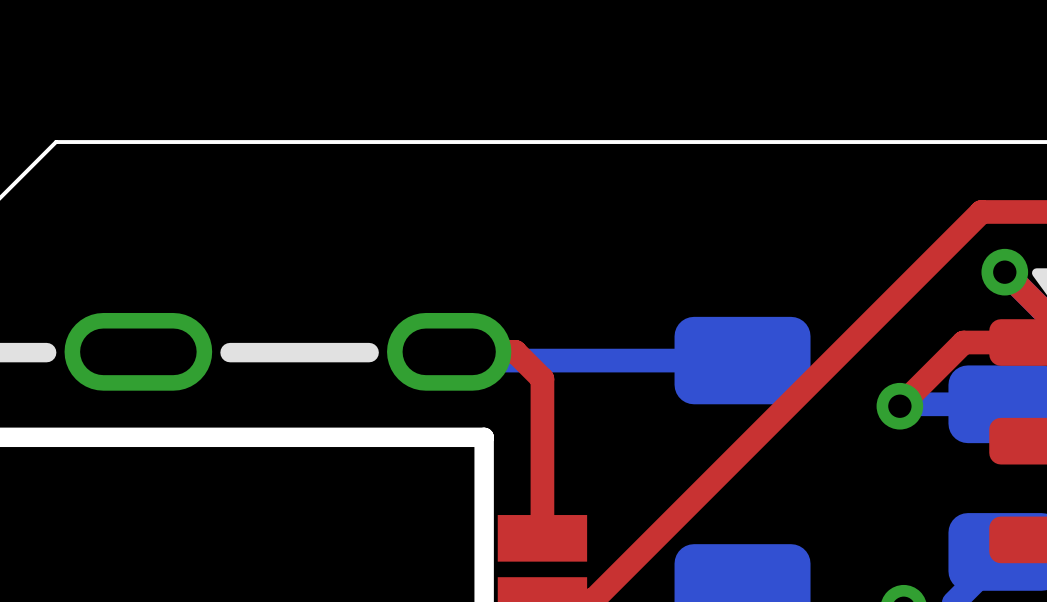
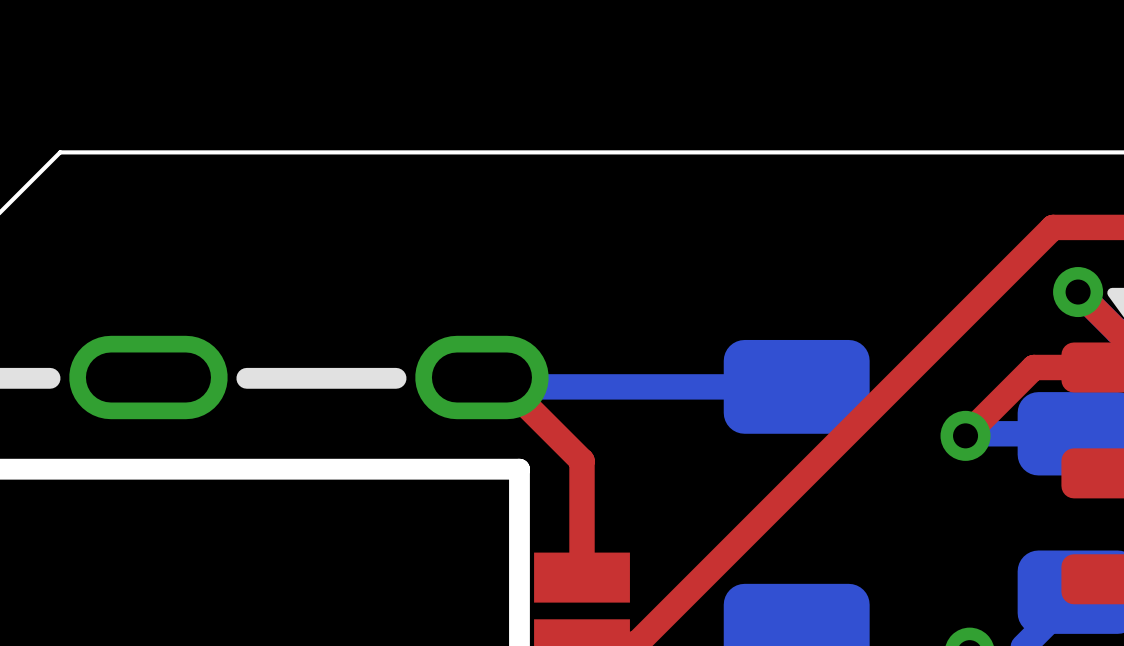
top track: (449, 351) (515, 351) (542, 379) (542, 429) -> (504, 383) (582, 460)

